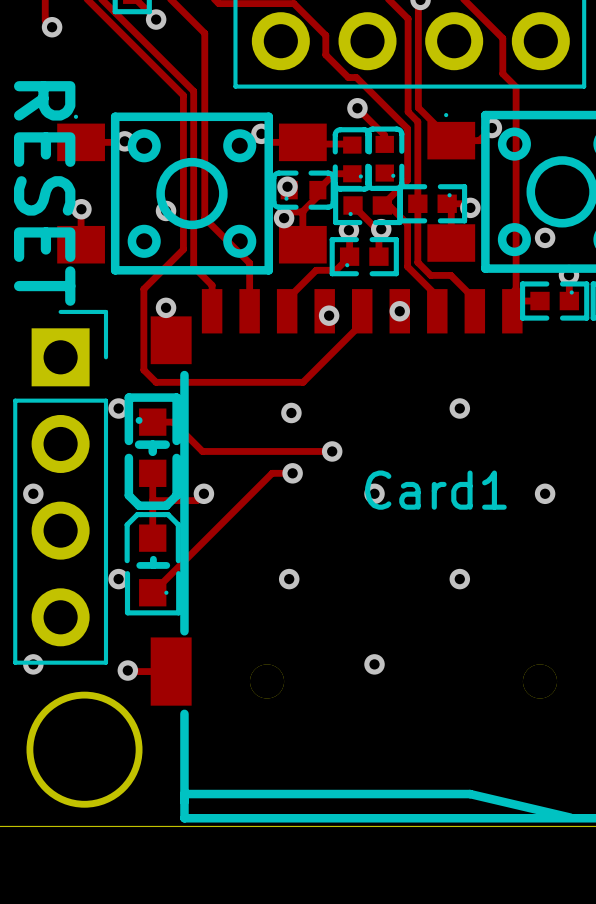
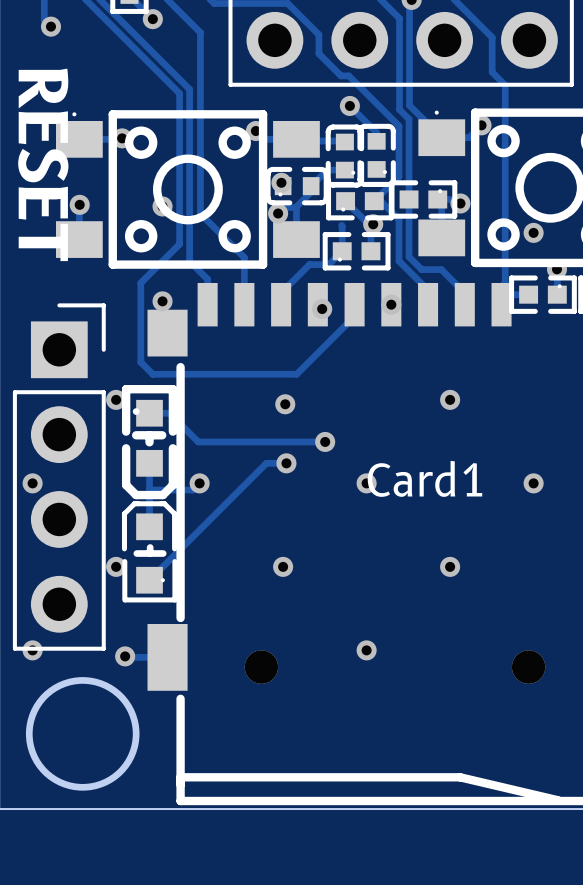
via: (348, 230) -> none

